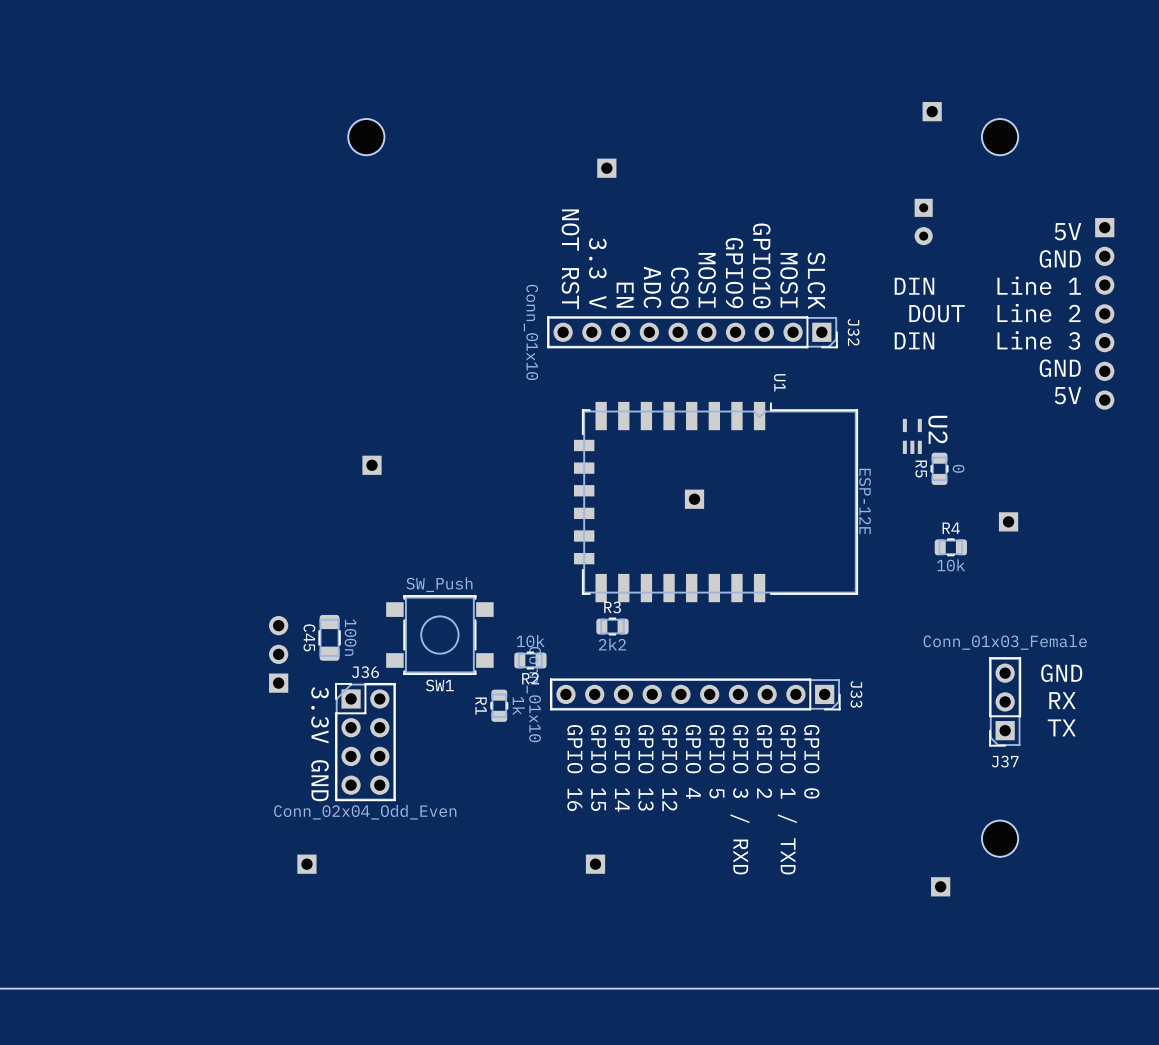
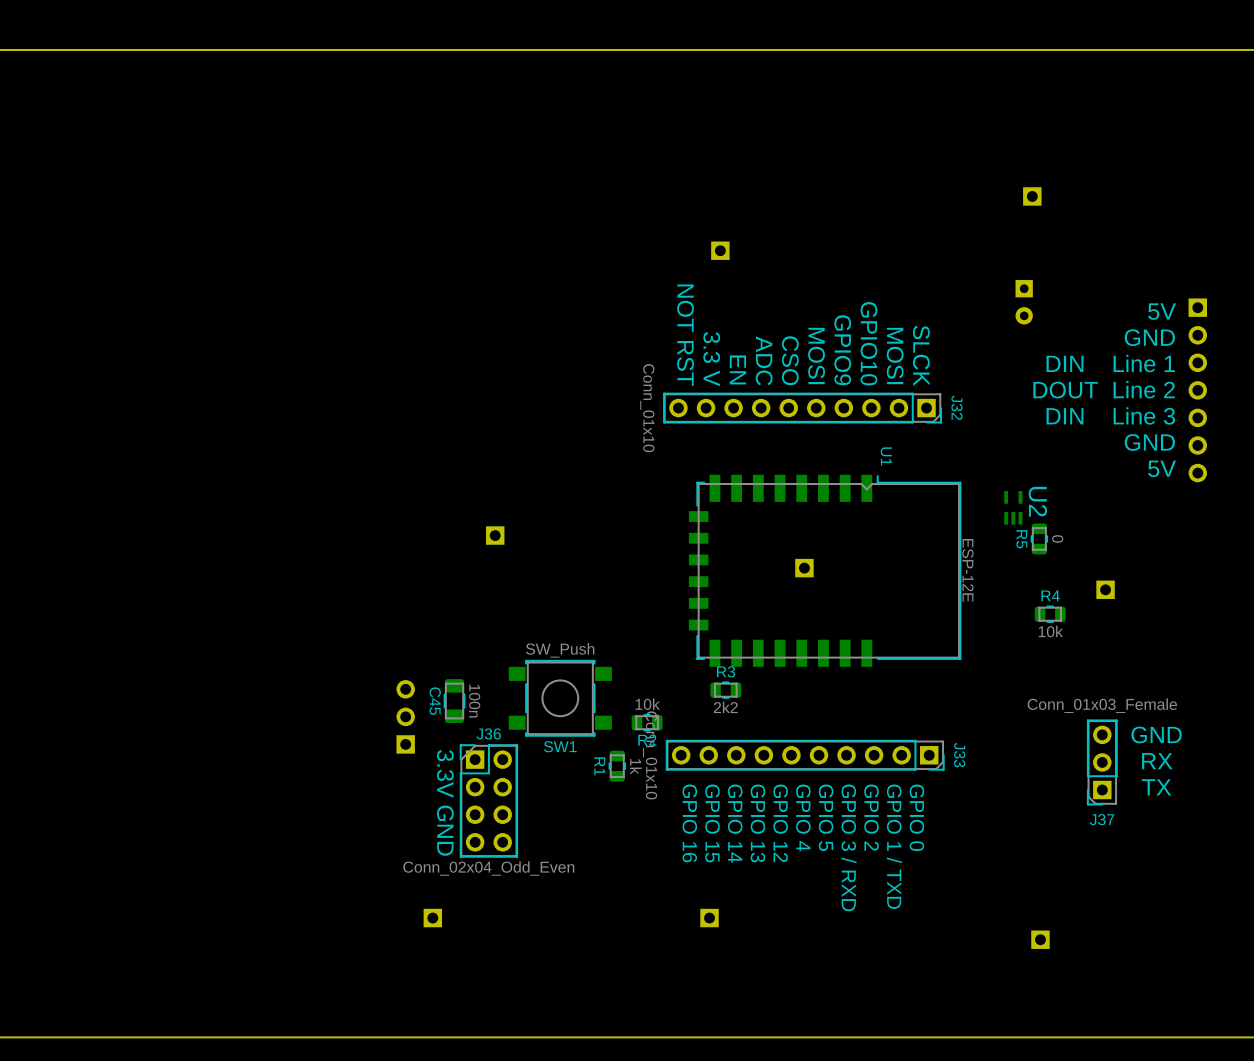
part: (366, 137) -> none
part: (1000, 137) -> none
part: (1000, 838) -> none

